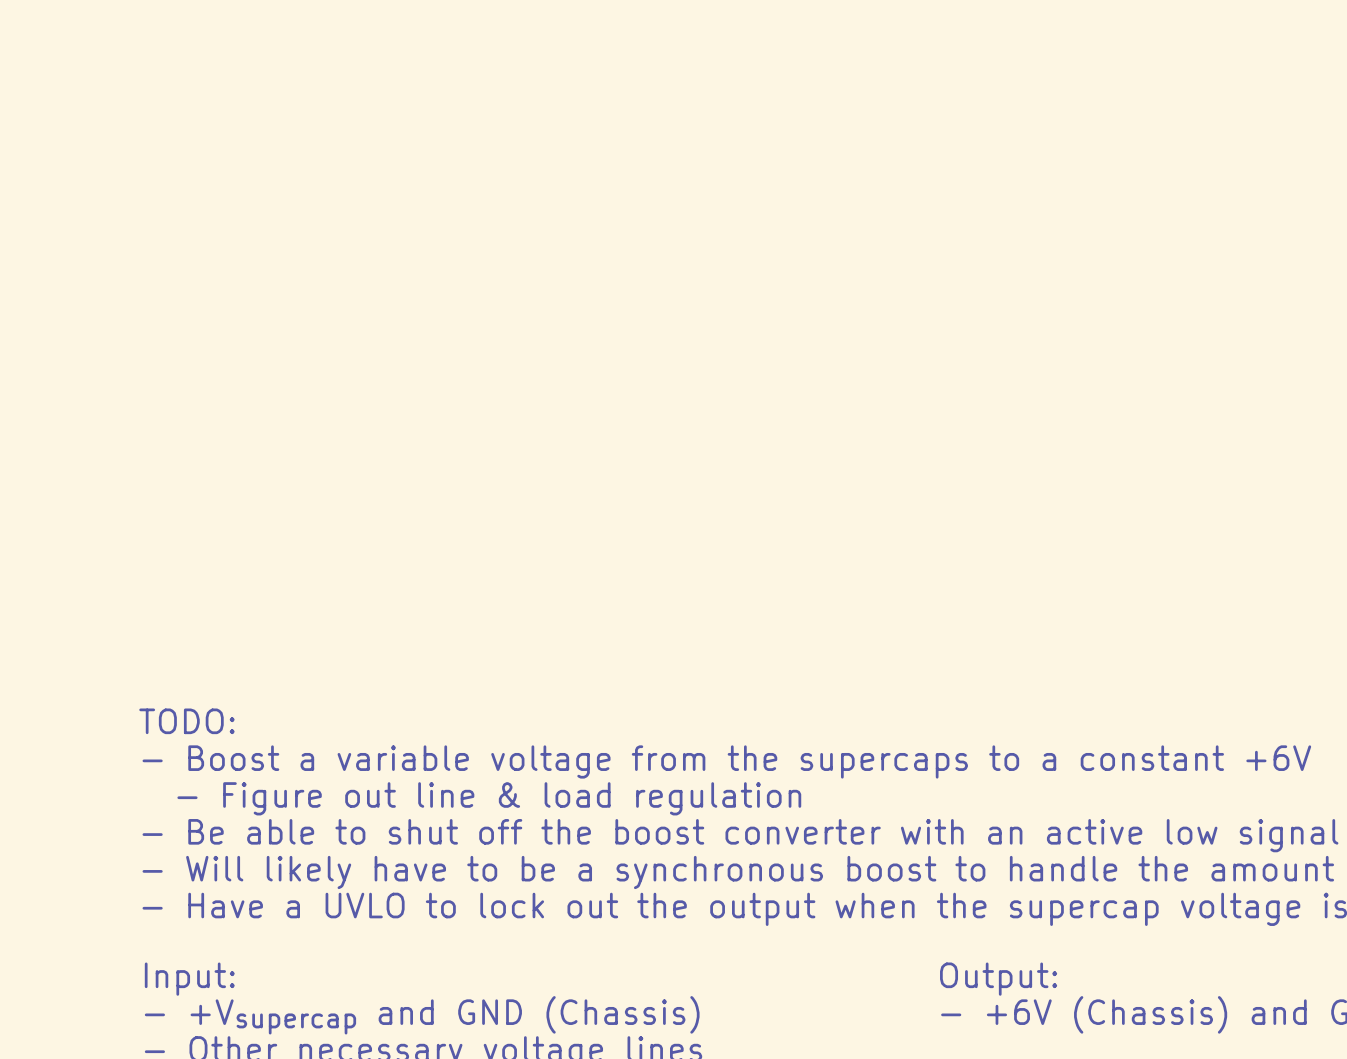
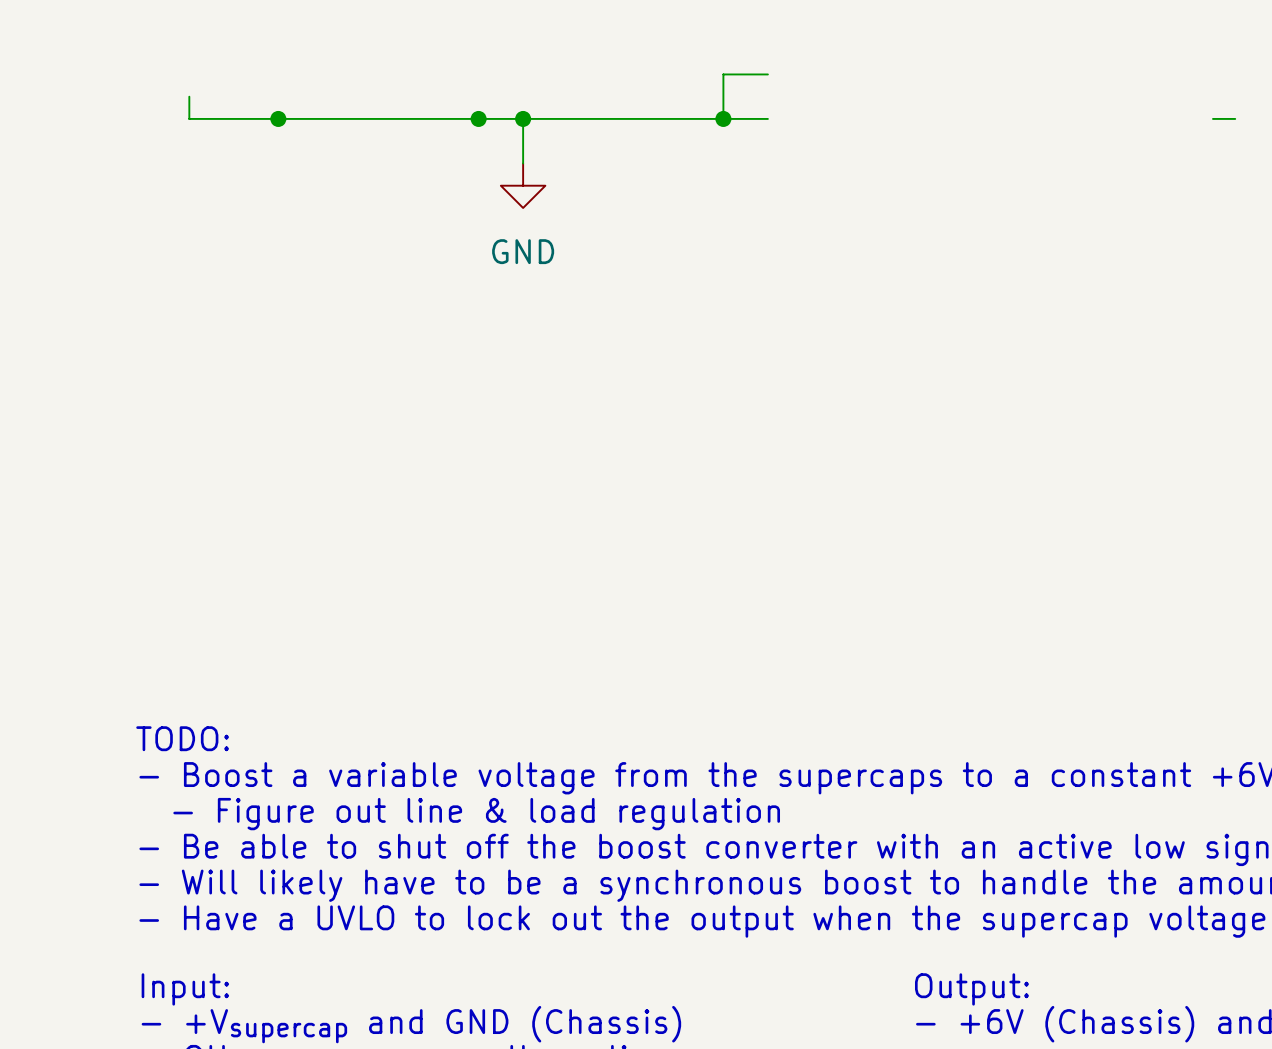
wire: none -> (767, 74) (723, 74) (723, 118)
wire: none -> (189, 96) (189, 118) (767, 118)
junction: none -> (278, 118)
junction: none -> (478, 118)
wire: none -> (523, 118) (523, 163)
junction: none -> (523, 118)
junction: none -> (723, 118)
wire: none -> (1212, 118) (1235, 118)
power symbol: none -> GND (523, 185)

